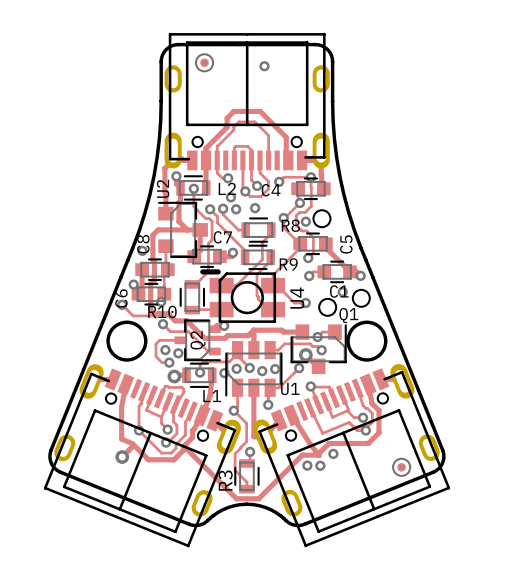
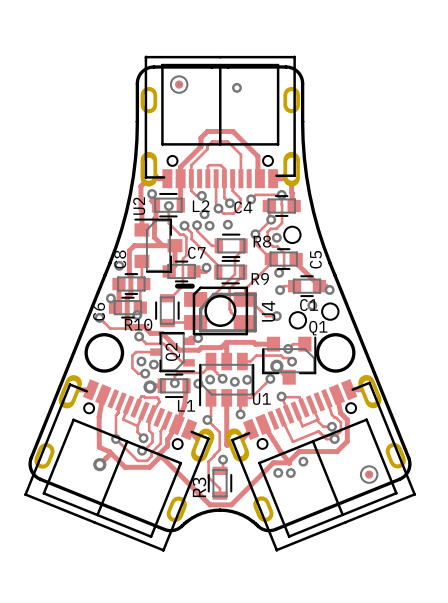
line: none -> (213, 294) (255, 294) (255, 330) (200, 330) (200, 309) (213, 294)

